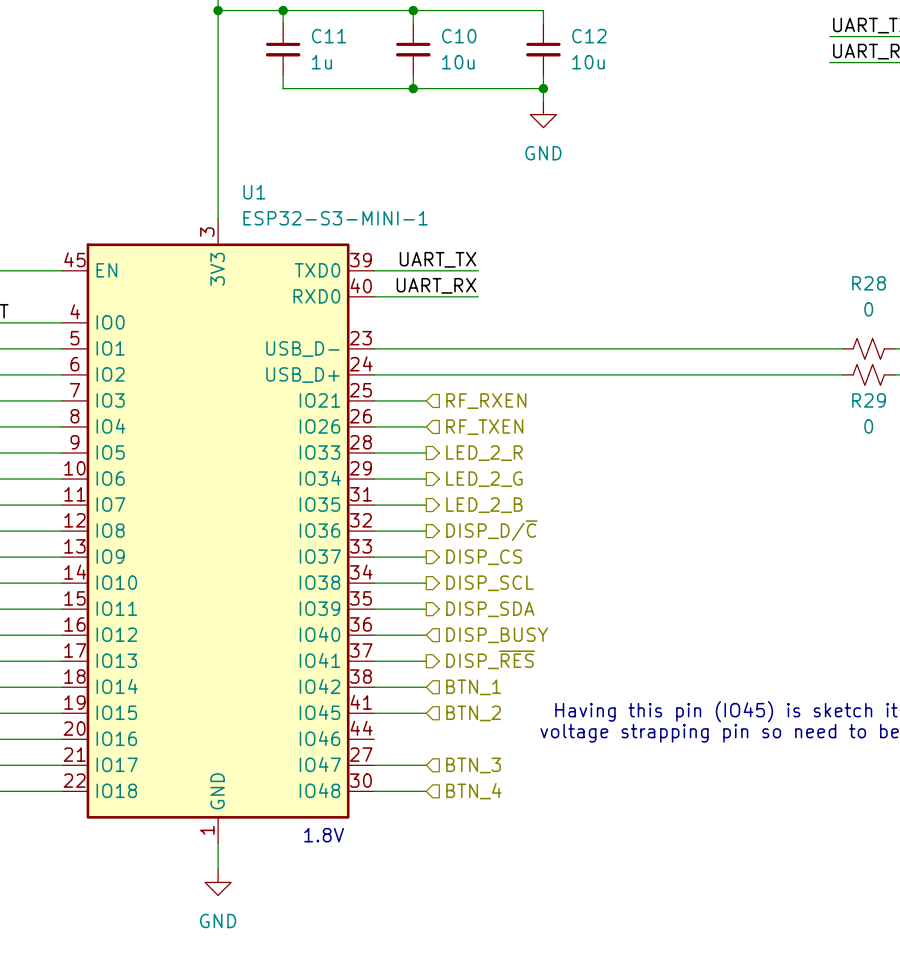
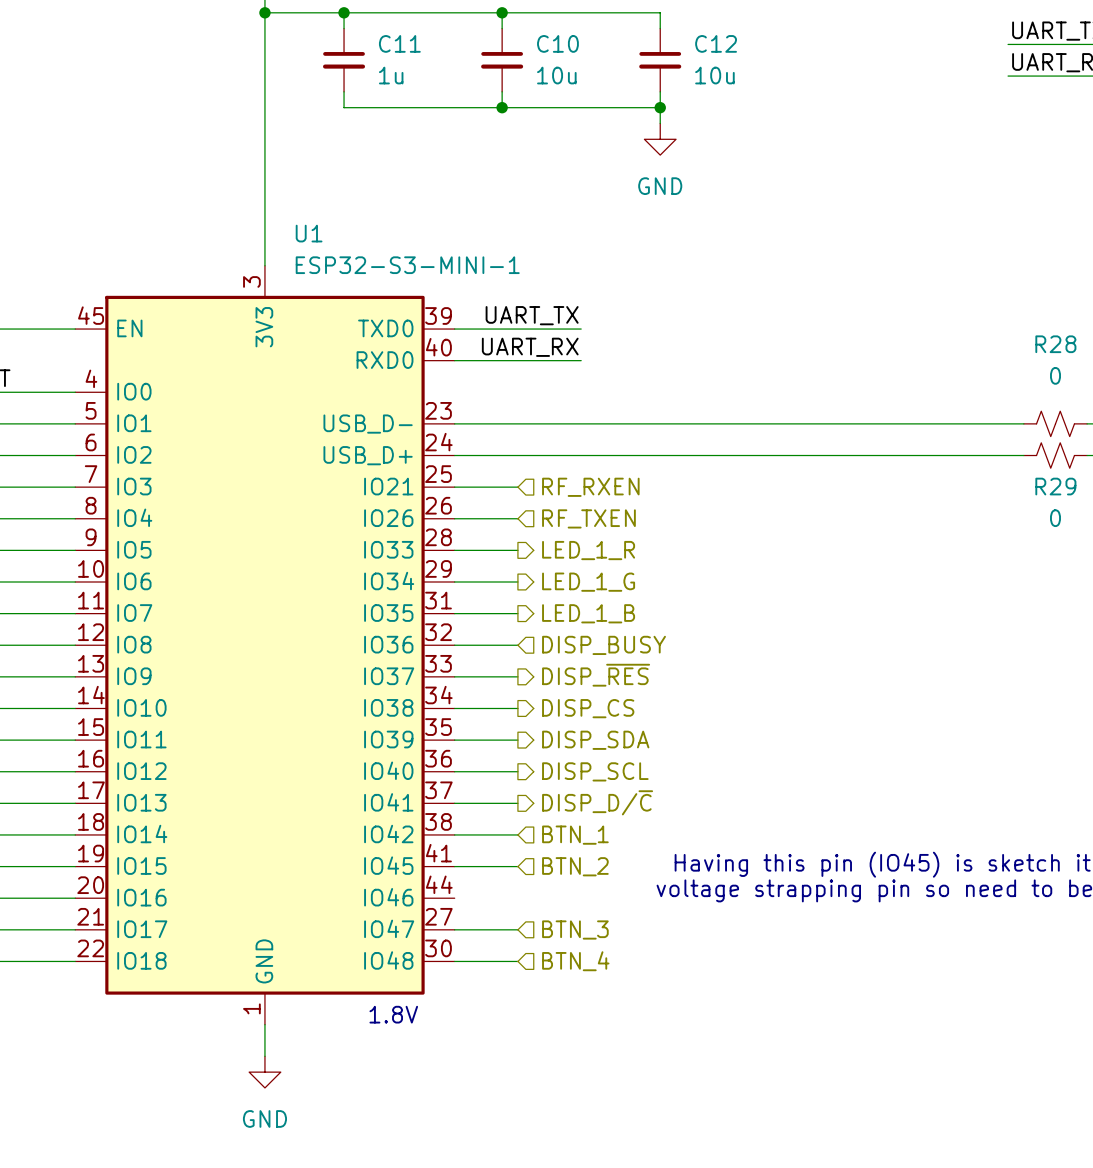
hierarchical label: LED_2_R (484, 453) -> LED_1_R (588, 550)
hierarchical label: LED_2_G (484, 479) -> LED_1_G (588, 582)
hierarchical label: LED_2_B (484, 505) -> LED_1_B (588, 613)
hierarchical label shape: output (491, 530) -> input (604, 645)
hierarchical label: DISP_D/~{C} (491, 530) -> DISP_BUSY (604, 645)
hierarchical label: DISP_CS (484, 557) -> DISP_~{RES} (596, 675)
hierarchical label: DISP_SCL (490, 583) -> DISP_CS (588, 708)
hierarchical label shape: input (497, 635) -> output (595, 771)
hierarchical label: DISP_BUSY (497, 635) -> DISP_SCL (595, 771)
hierarchical label: DISP_~{RES} (490, 659) -> DISP_D/~{C} (597, 802)

